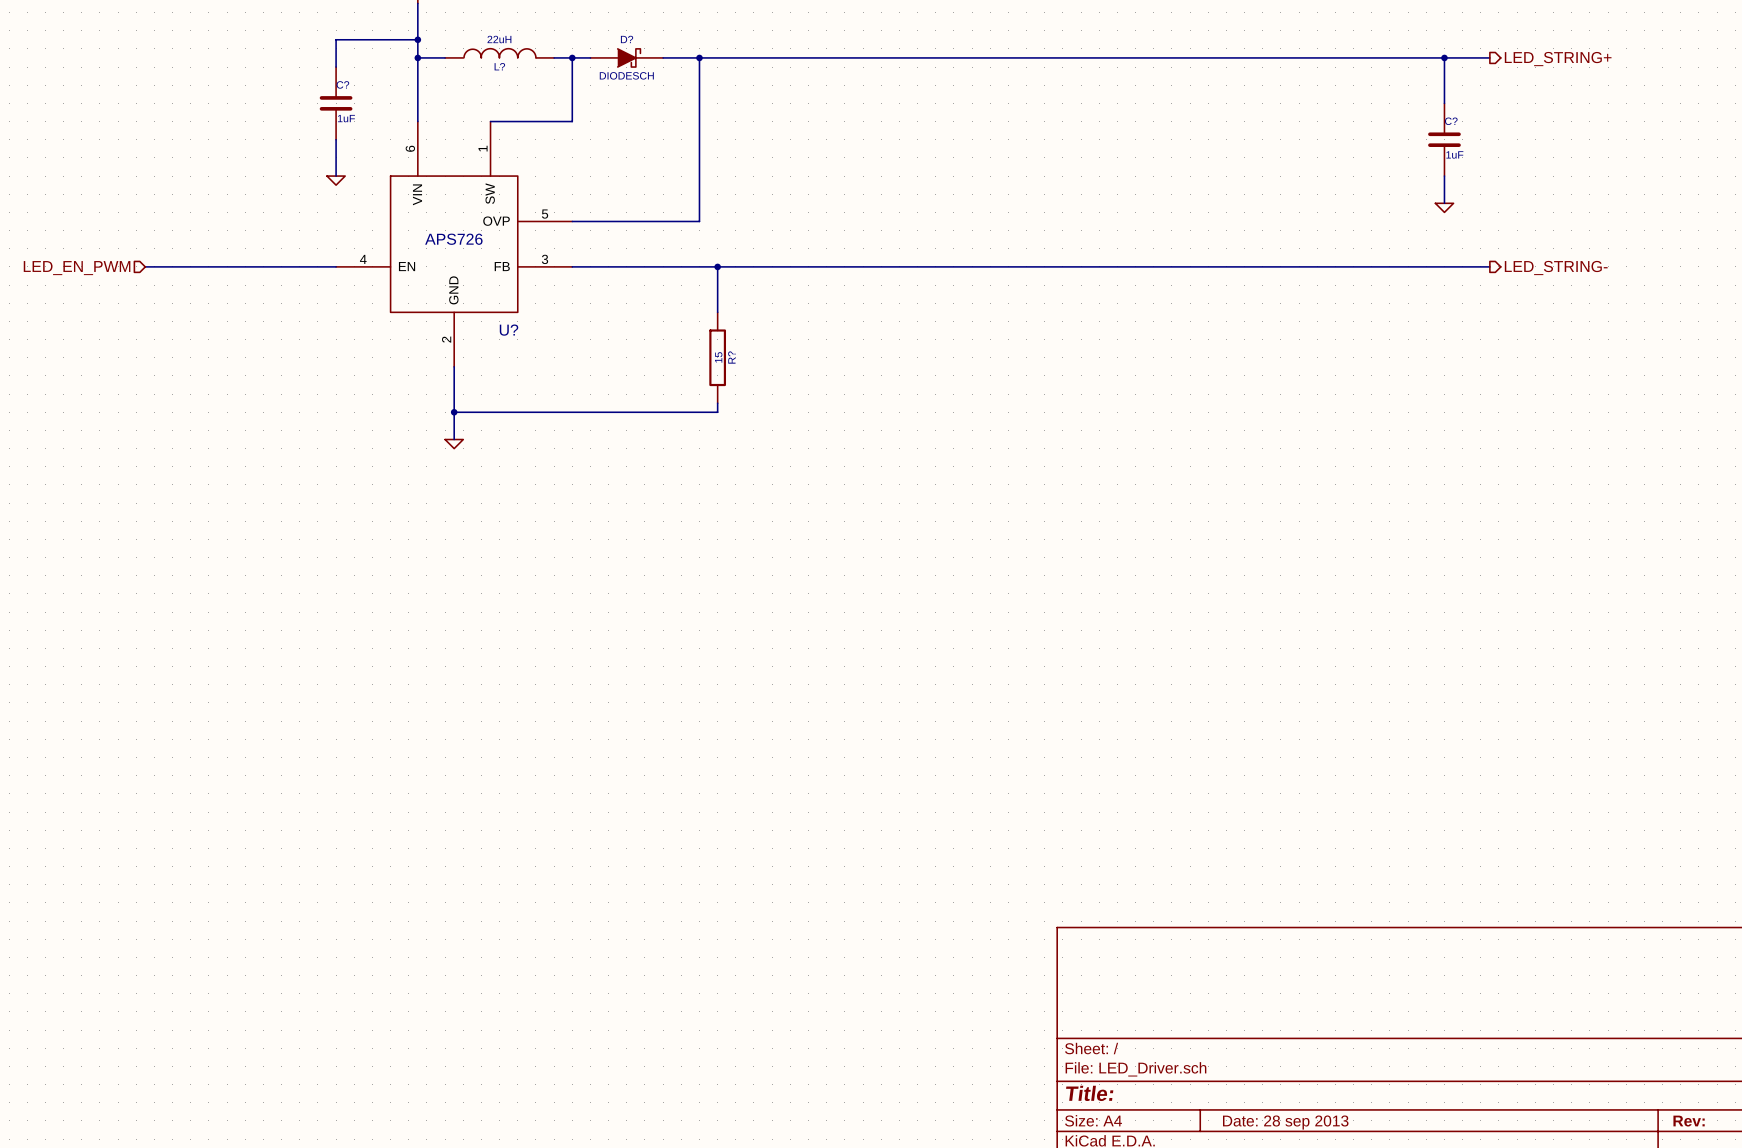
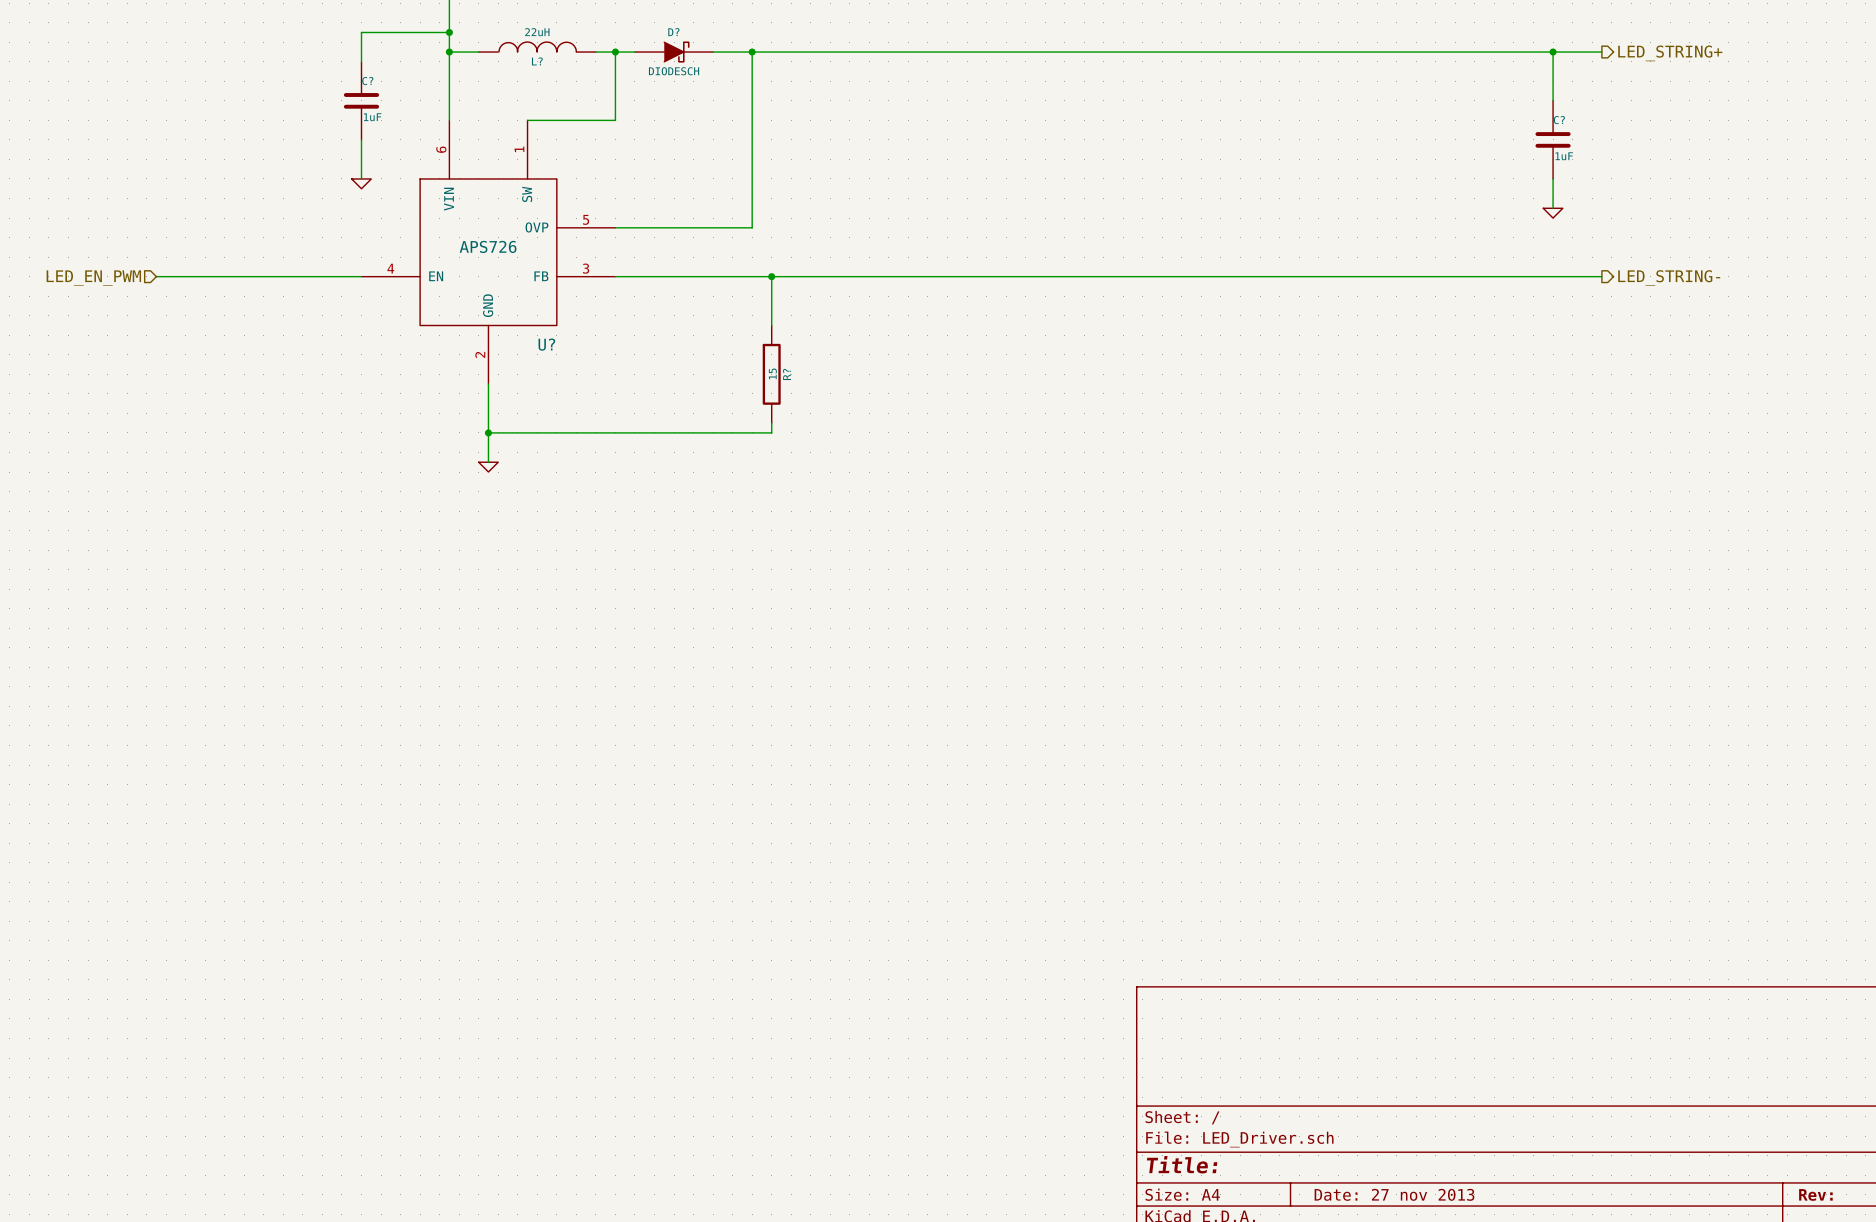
title block: Date: 28 sep 2013 (1285, 1122) -> Date: 27 nov 2013 (1394, 1194)

